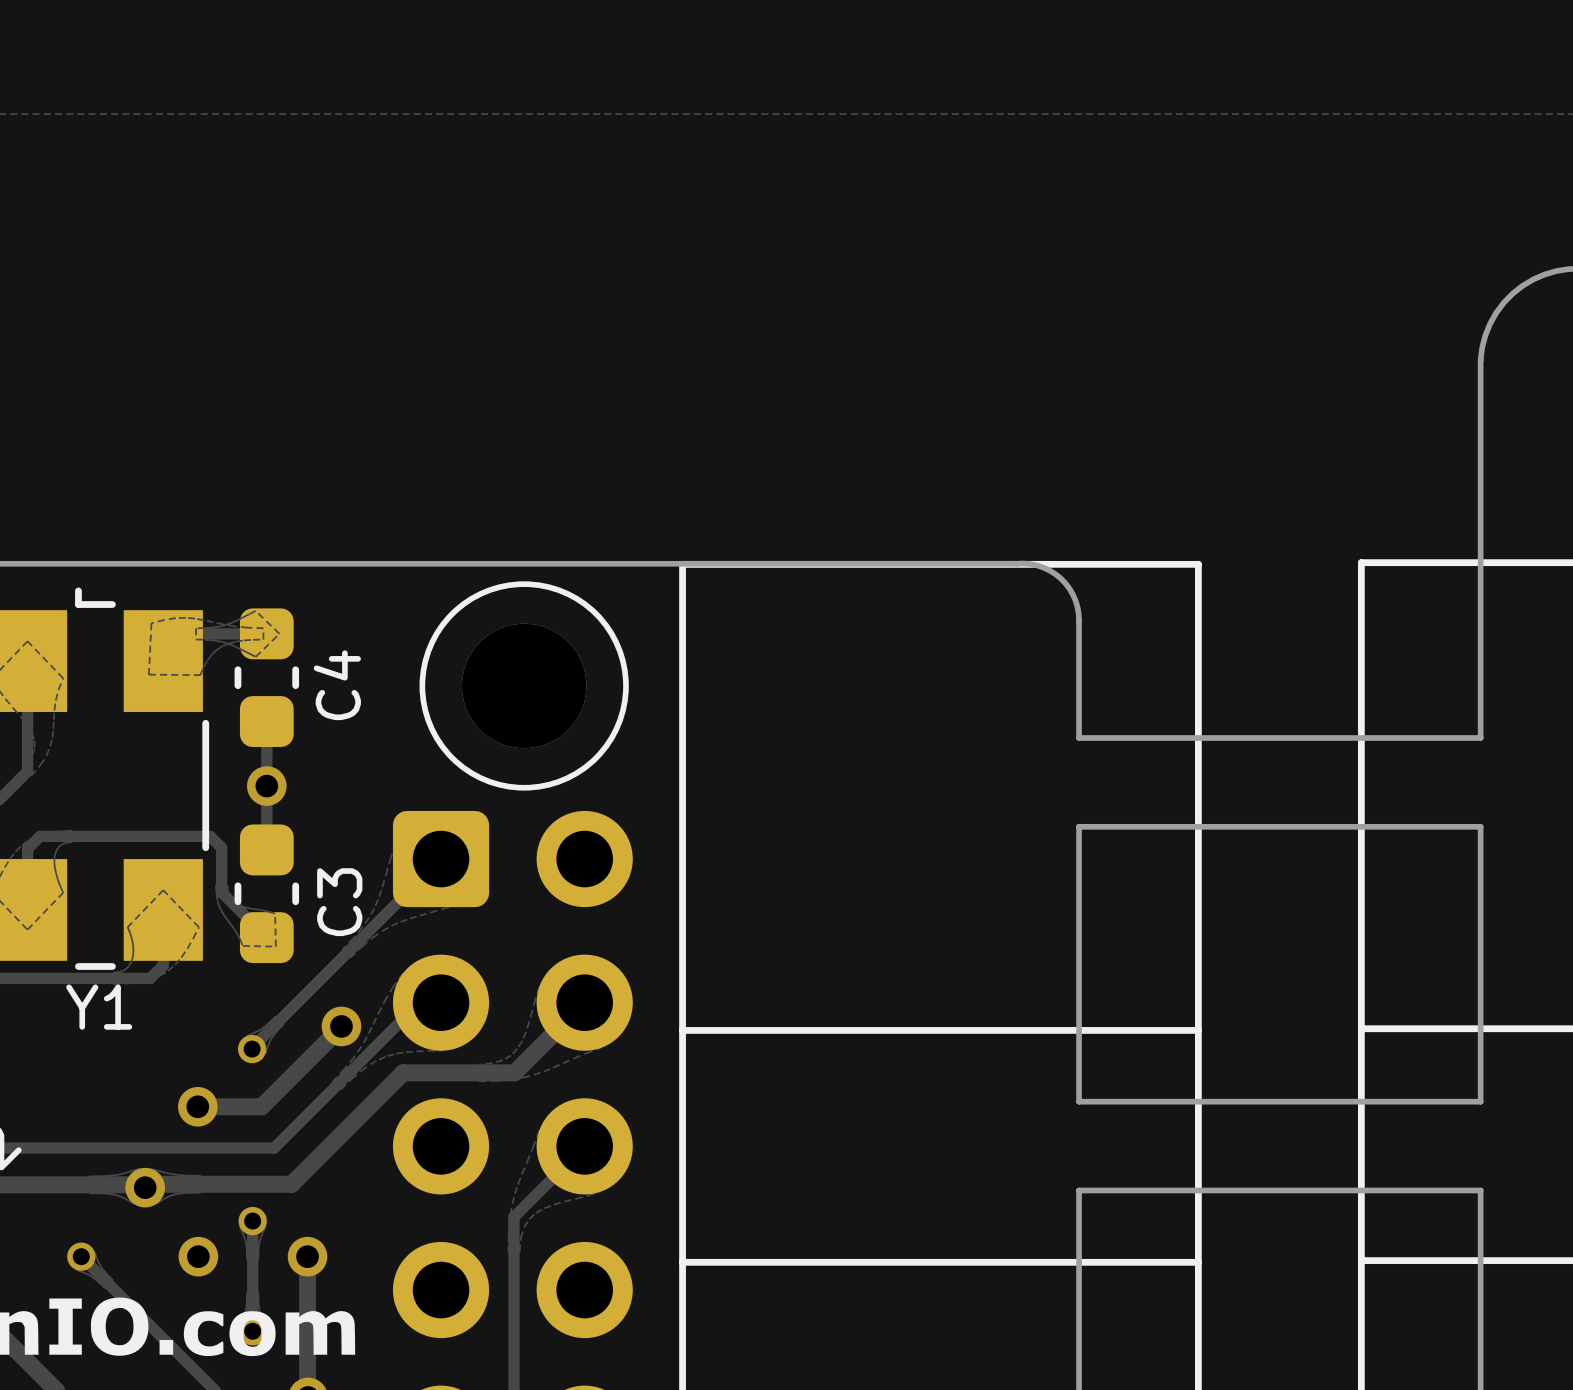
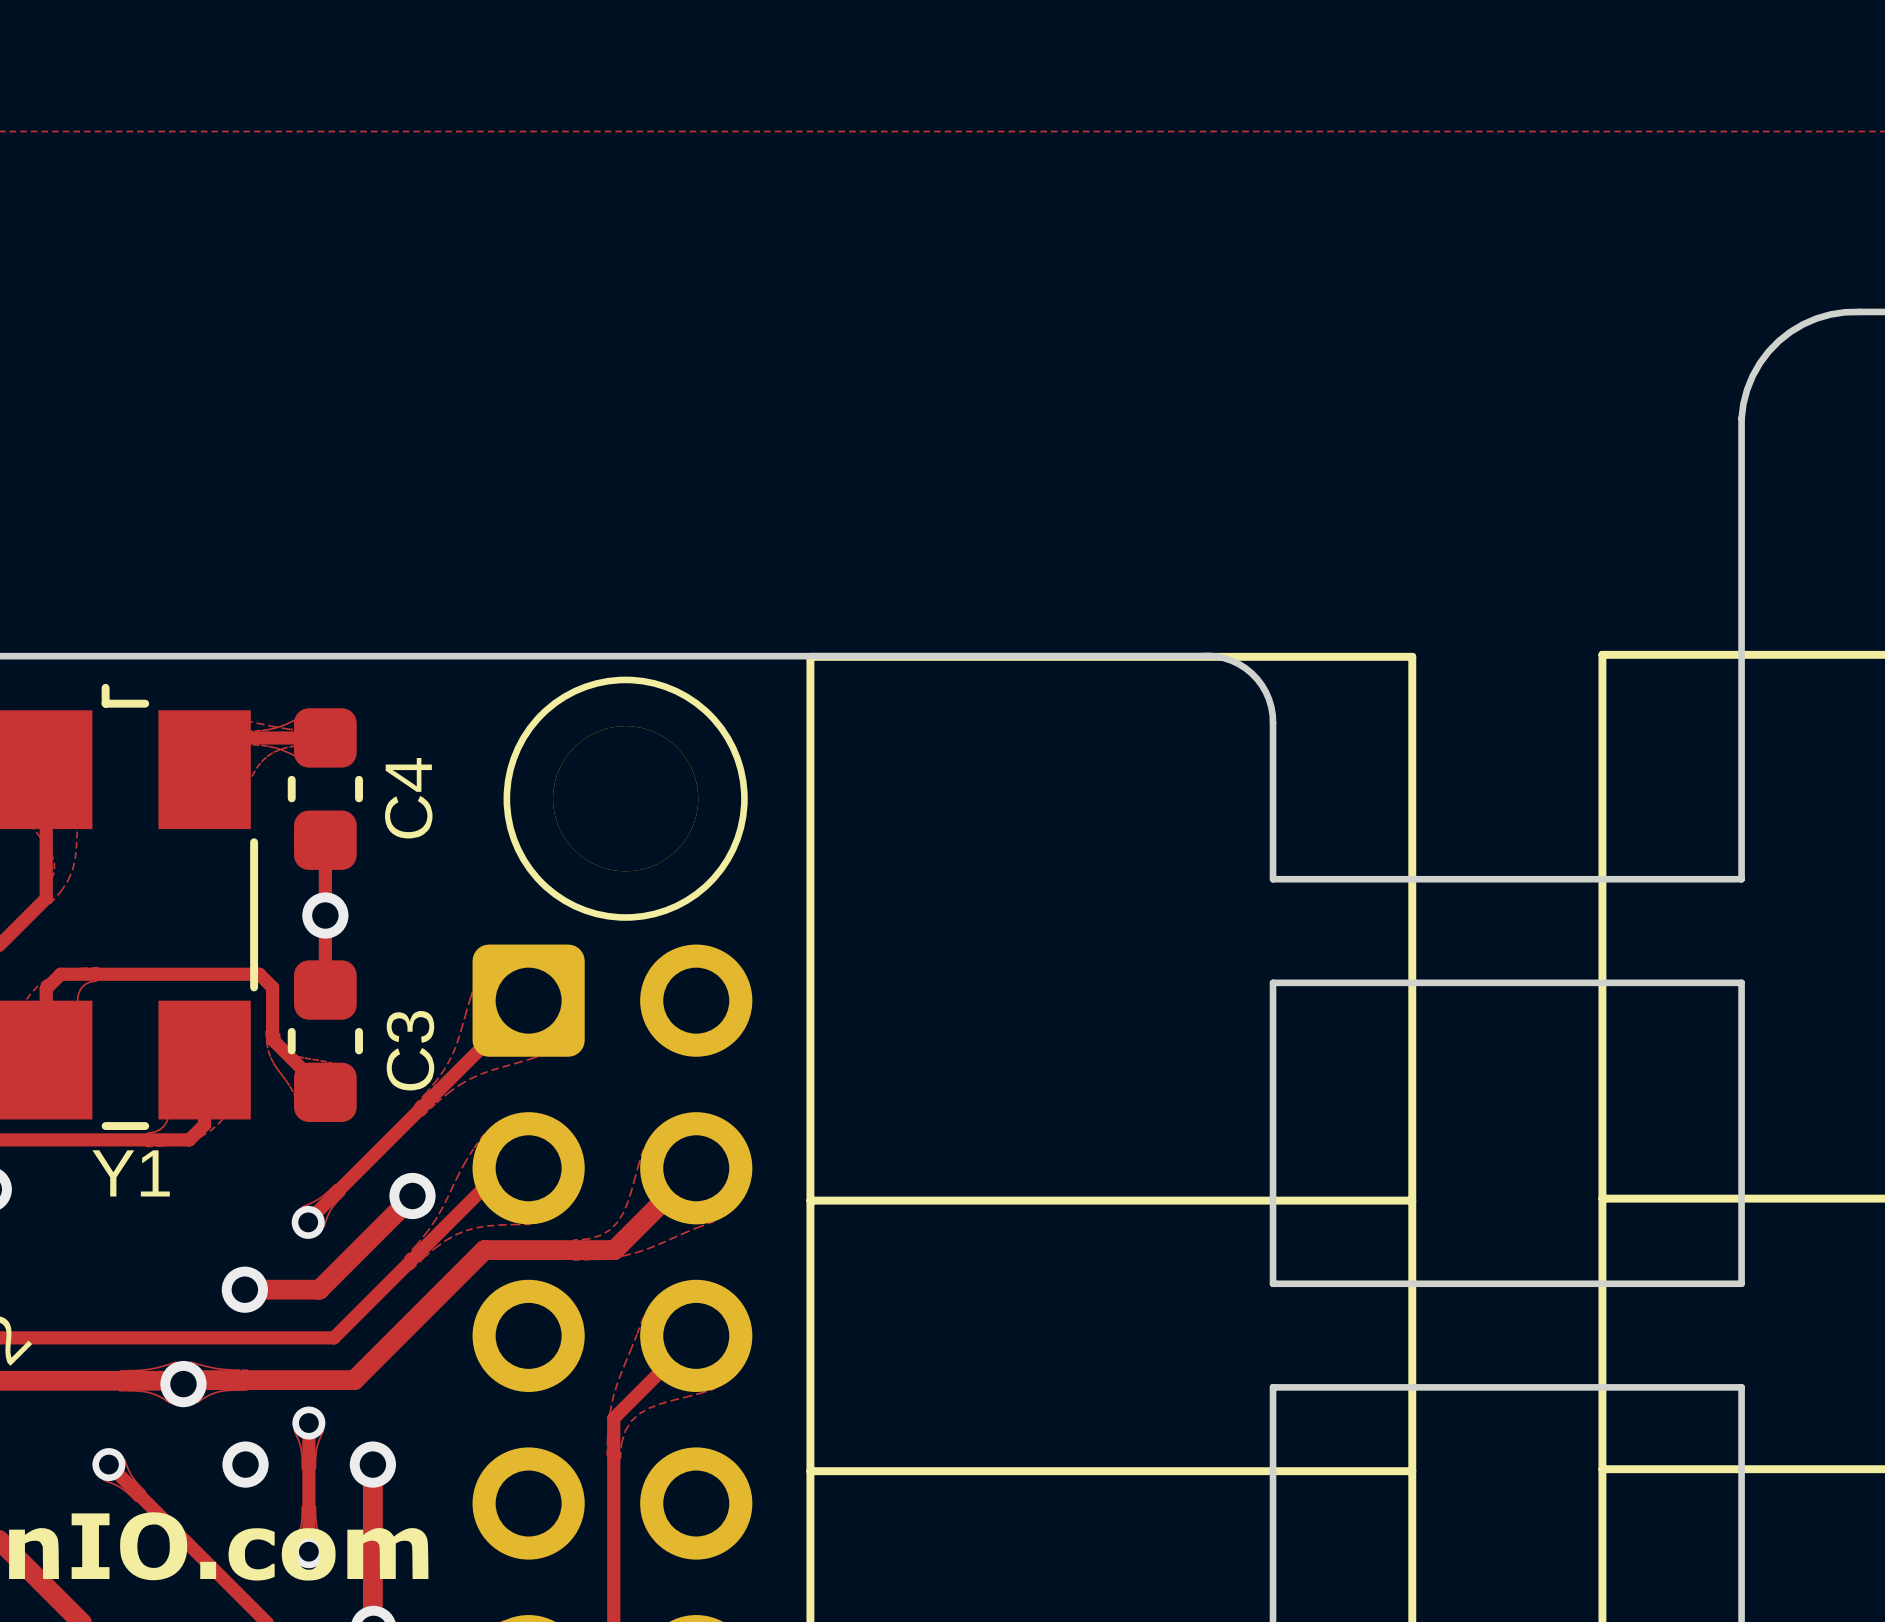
board edge: (1079, 737) (1480, 737) -> (1273, 859) (1273, 879) (1741, 879) (1741, 859)
board edge: (1079, 843) (1079, 826) (1480, 826) (1480, 843) -> (1273, 982) (1741, 982)

